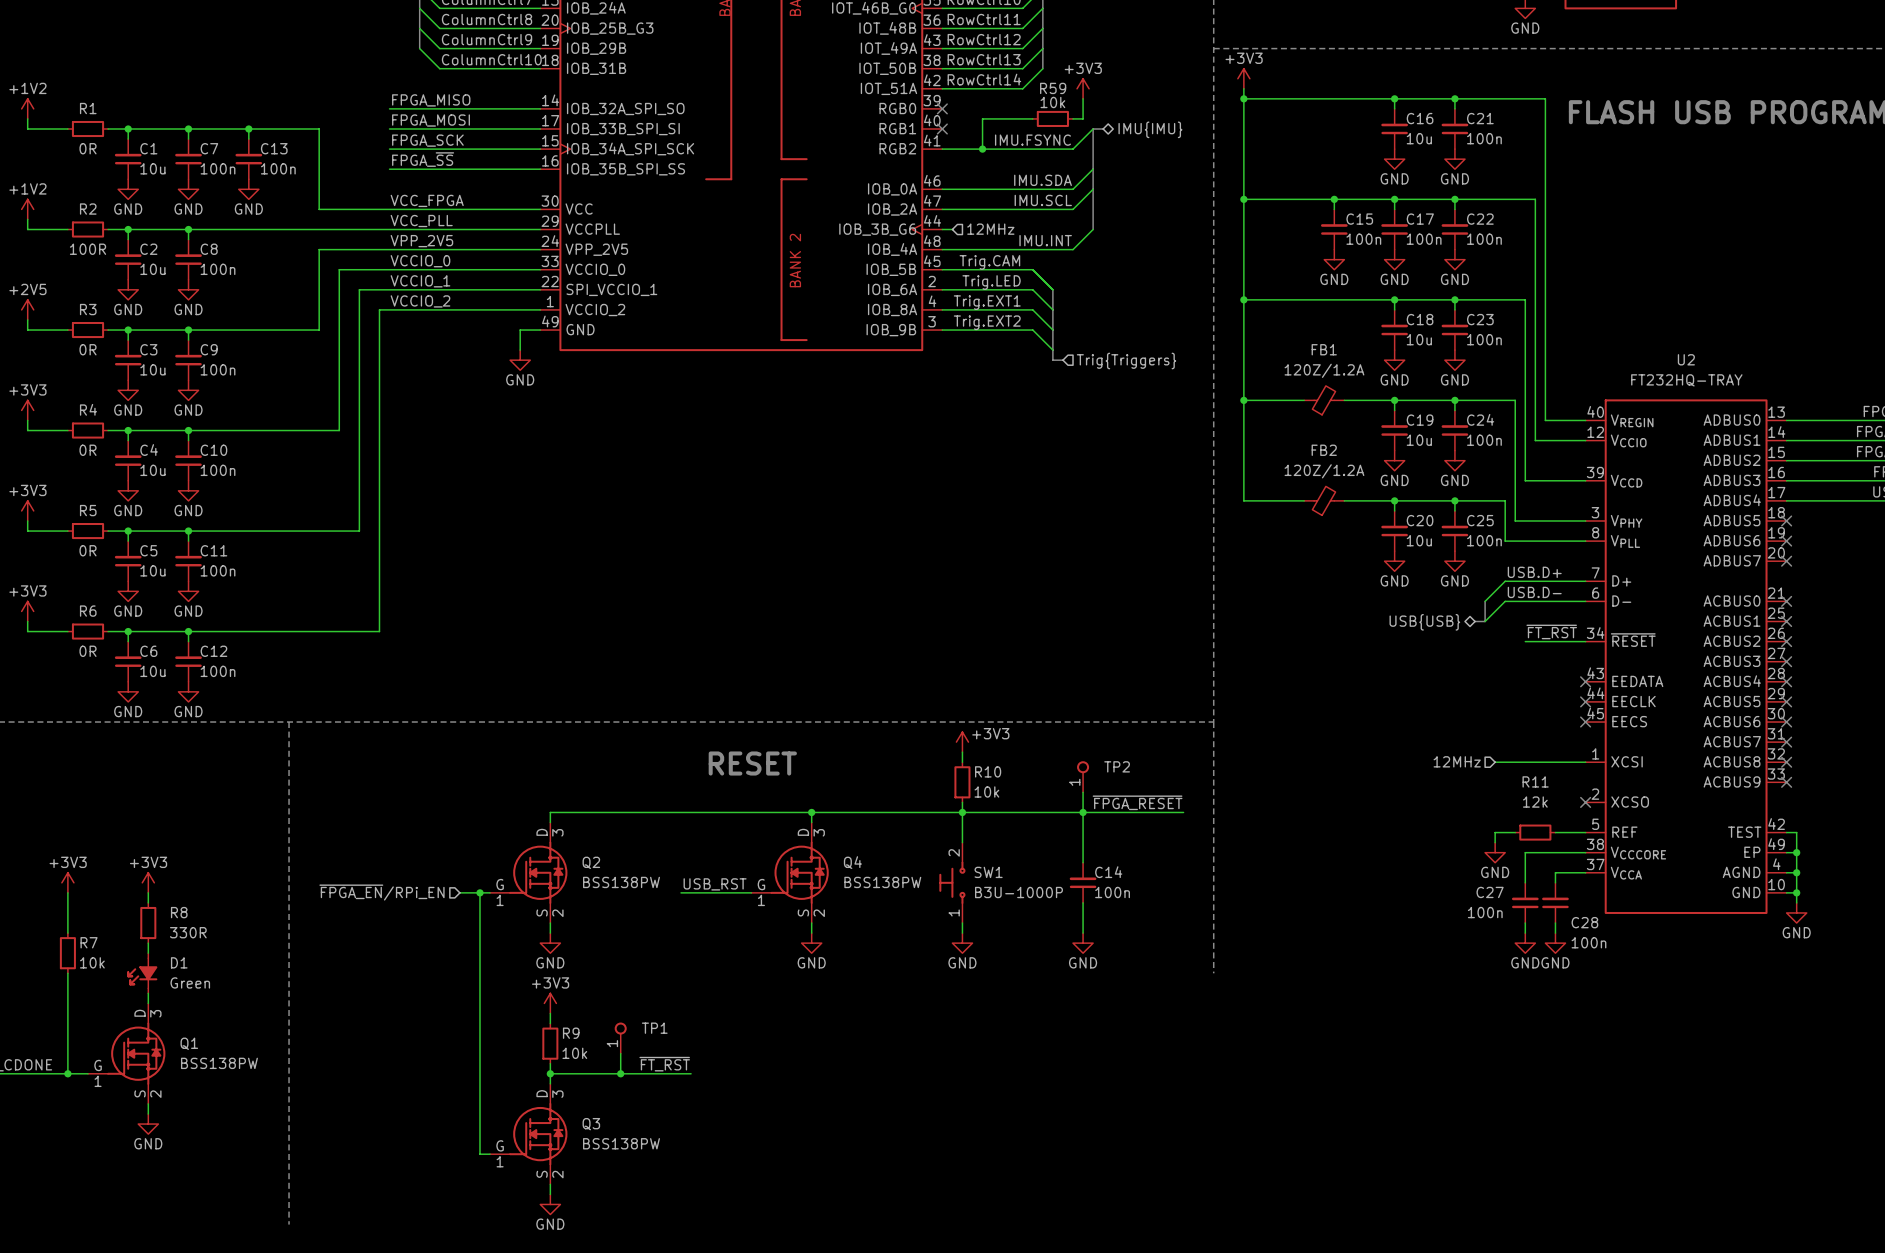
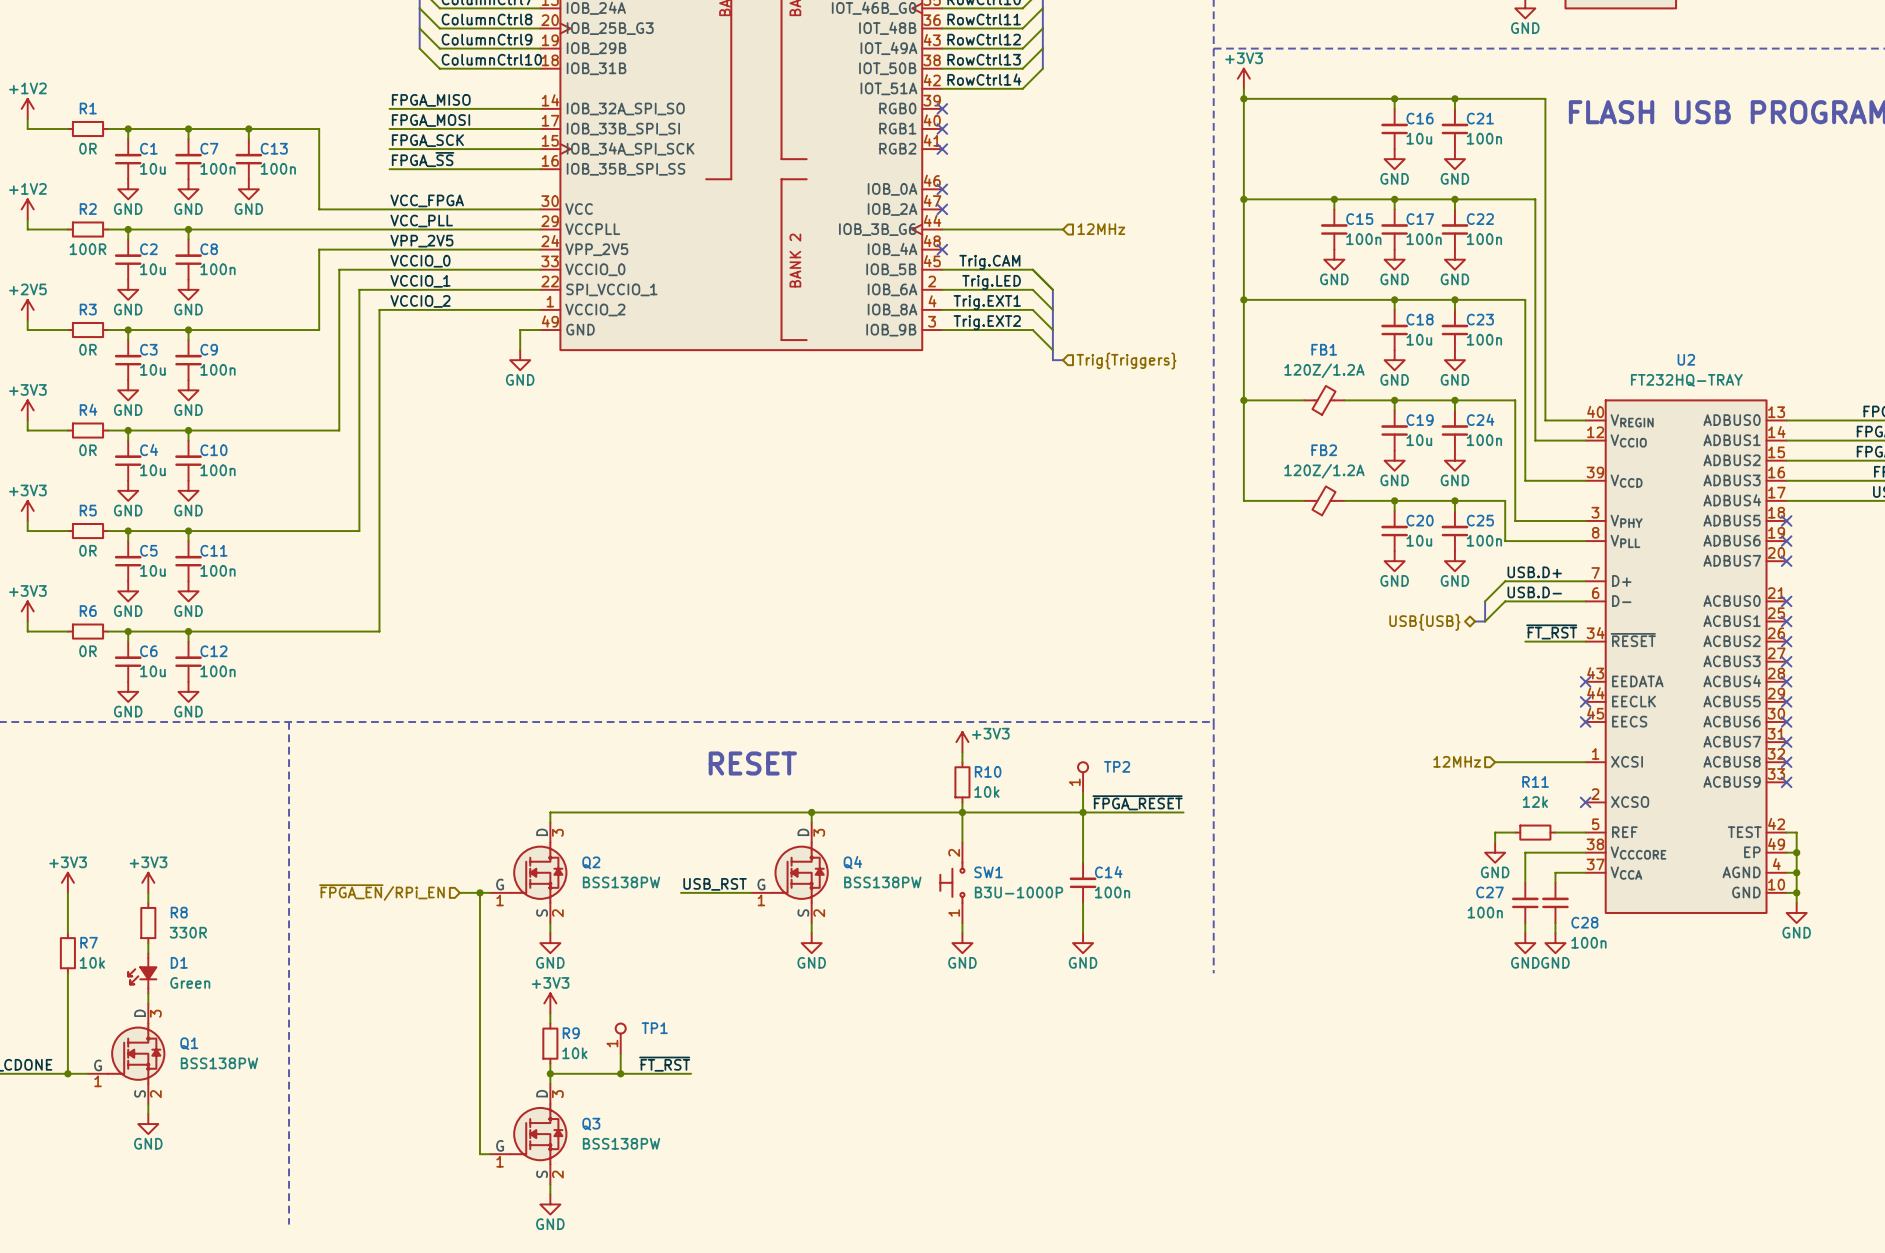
power symbol: +3V3 (1083, 88) -> none
wire: (1083, 98) (1083, 118) (1073, 118) -> none
wire: (1032, 118) (982, 118) (982, 149) -> none
R59: (1052, 118) -> none
wire: (1093, 129) (1073, 149) (942, 149) -> none
bus: (1103, 129) (1093, 129) (1093, 229) -> none
hierarchical label: IMU{IMU} (1150, 129) -> none
label: IMU.FSYNC (1032, 140) -> none
no-connect mark: none -> (942, 149)
junction: (982, 149) -> none
wire: (1093, 169) (1073, 189) (942, 189) -> none
label: IMU.SDA (1043, 180) -> none
no-connect mark: none -> (942, 189)
wire: (1093, 189) (1073, 209) (942, 209) -> none
label: IMU.SCL (1043, 200) -> none
no-connect mark: none -> (942, 209)
wire: none -> (952, 229) (1062, 229)
hierarchical label position: 12MHz (990, 229) -> 12MHz (1101, 229)
wire: (1093, 229) (1073, 249) (942, 249) -> none
label: IMU.INT (1045, 240) -> none
no-connect mark: none -> (942, 249)

